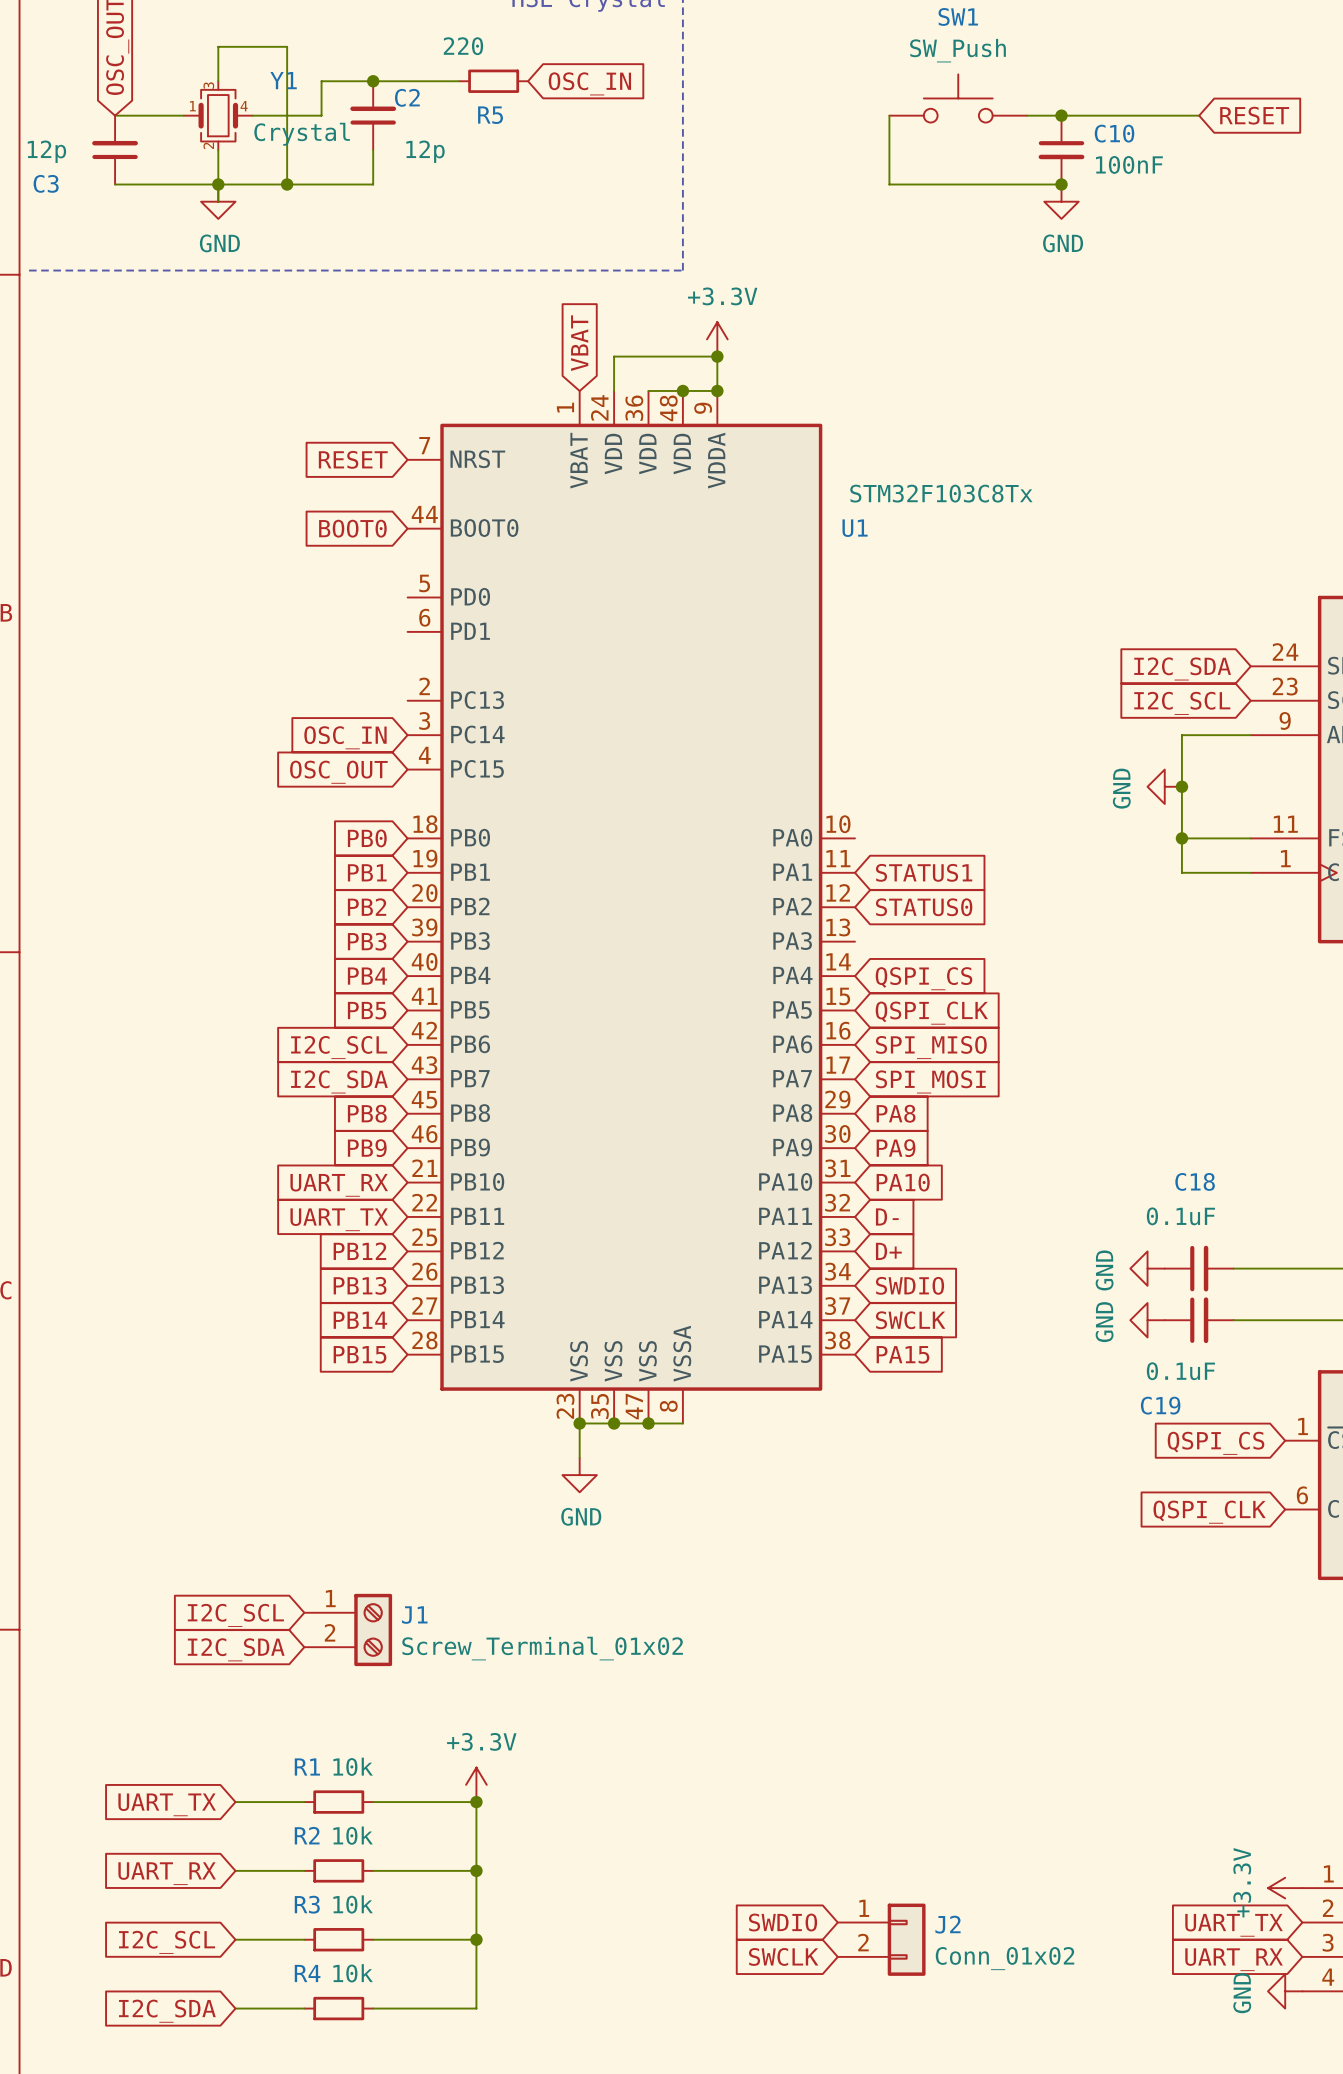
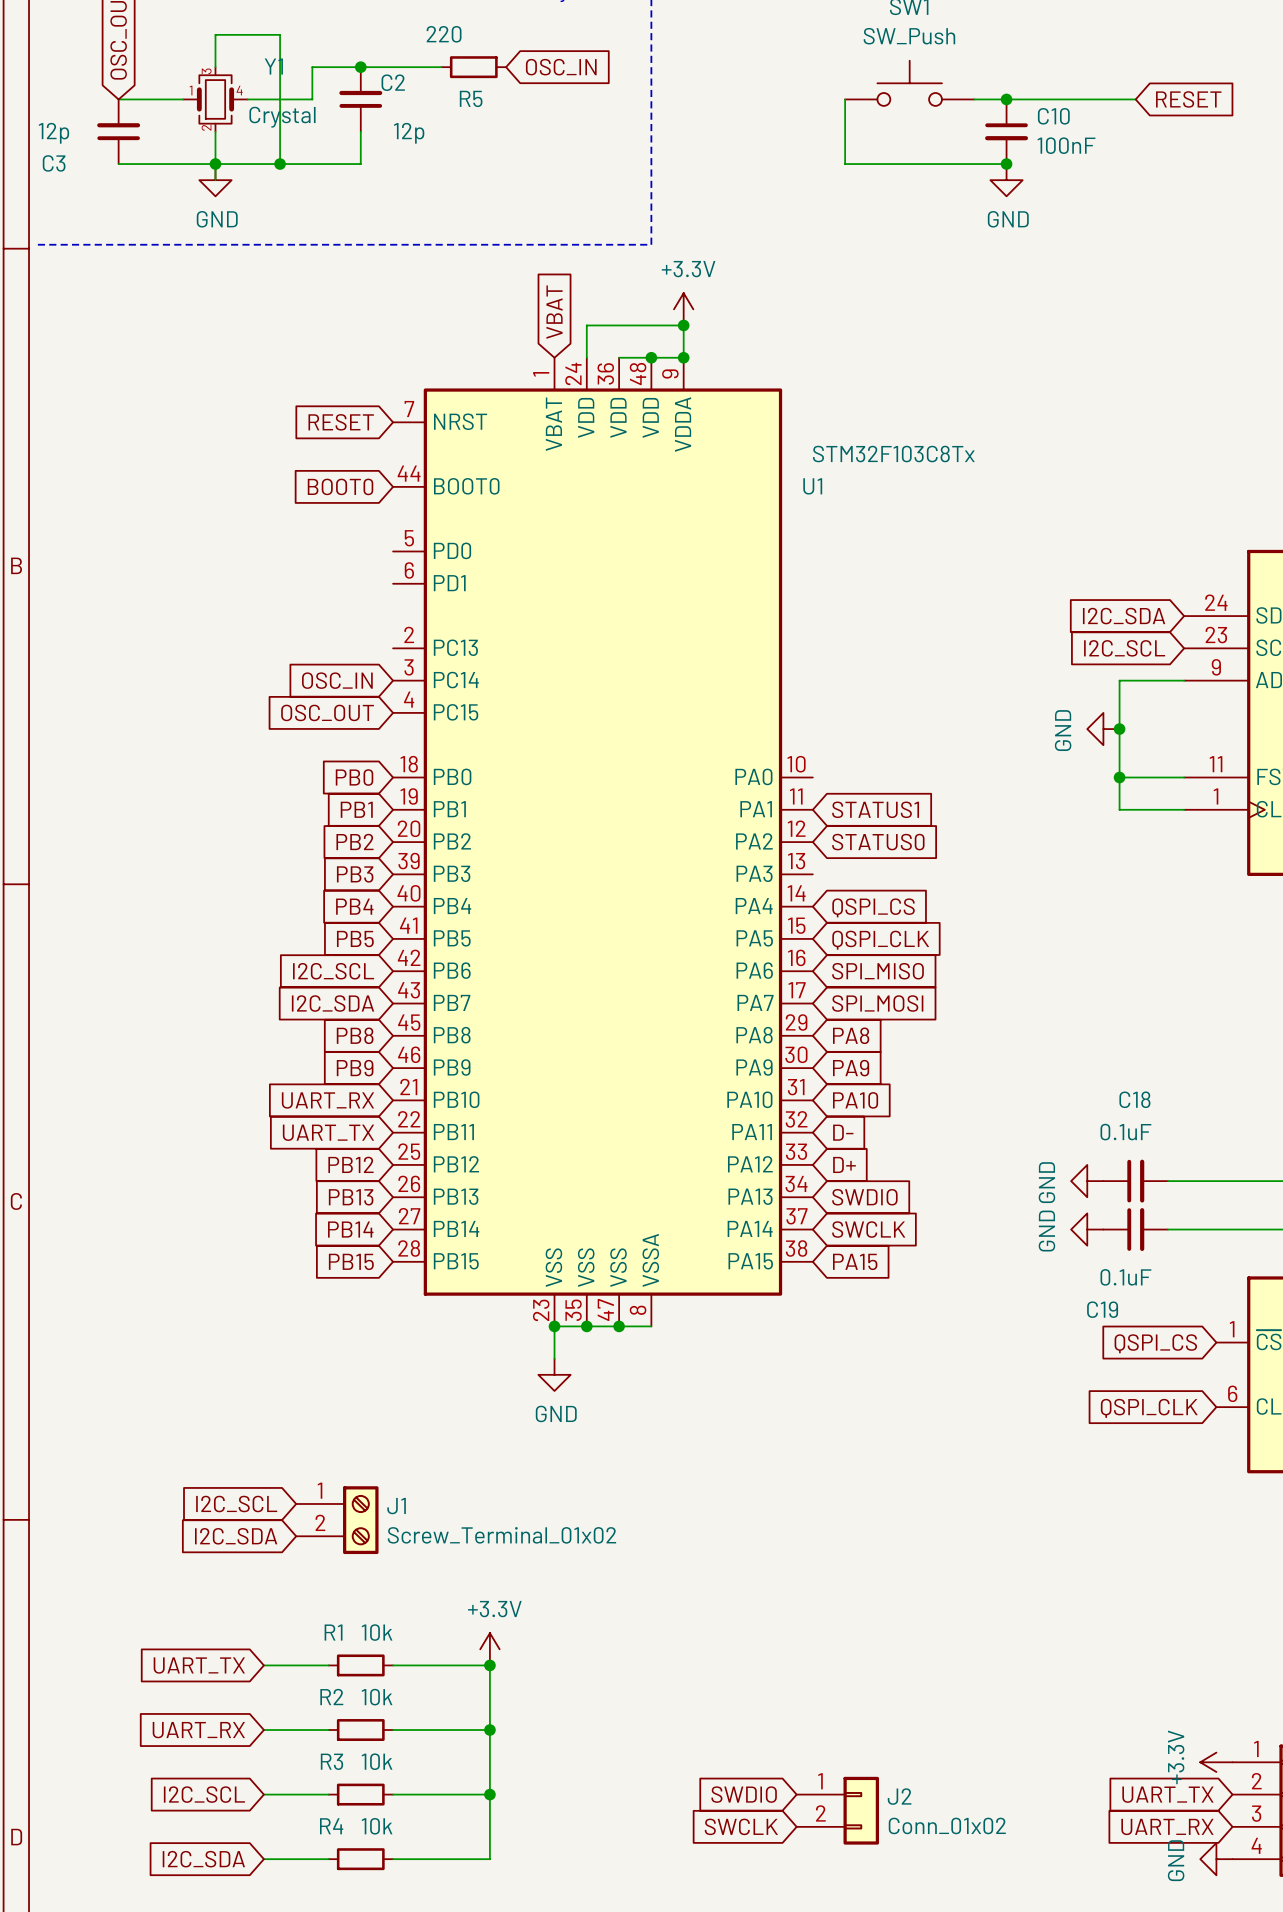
power symbol position: +3.3V (476, 1784) -> +3.3V (489, 1649)
junction: none -> (489, 1665)
wire: (235, 1802) (304, 1802) -> (263, 1665) (328, 1665)
R1 position: (338, 1802) -> (360, 1665)
wire: (373, 1802) (476, 1802) (476, 2008) (373, 2008) -> (393, 1665) (489, 1665) (489, 1859) (393, 1859)
junction: (476, 1802) -> none
global label position: UART_TX (167, 1804) -> UART_TX (199, 1665)
junction: none -> (489, 1730)
wire: (235, 1870) (304, 1870) -> (263, 1730) (328, 1730)
R2 position: (338, 1870) -> (360, 1730)
wire: (373, 1870) (476, 1870) -> (393, 1730) (489, 1730)
junction: (476, 1870) -> none
global label position: UART_RX (167, 1873) -> UART_RX (198, 1730)
junction: none -> (489, 1794)
wire: (235, 1939) (304, 1939) -> (263, 1794) (328, 1794)
R3 position: (338, 1939) -> (360, 1794)
wire: (373, 1939) (476, 1939) -> (393, 1794) (489, 1794)
junction: (476, 1939) -> none
global label position: I2C_SCL (167, 1942) -> I2C_SCL (204, 1794)
wire: (235, 2008) (304, 2008) -> (263, 1859) (328, 1859)
R4 position: (338, 2008) -> (360, 1859)
global label position: I2C_SDA (167, 2011) -> I2C_SDA (203, 1859)

